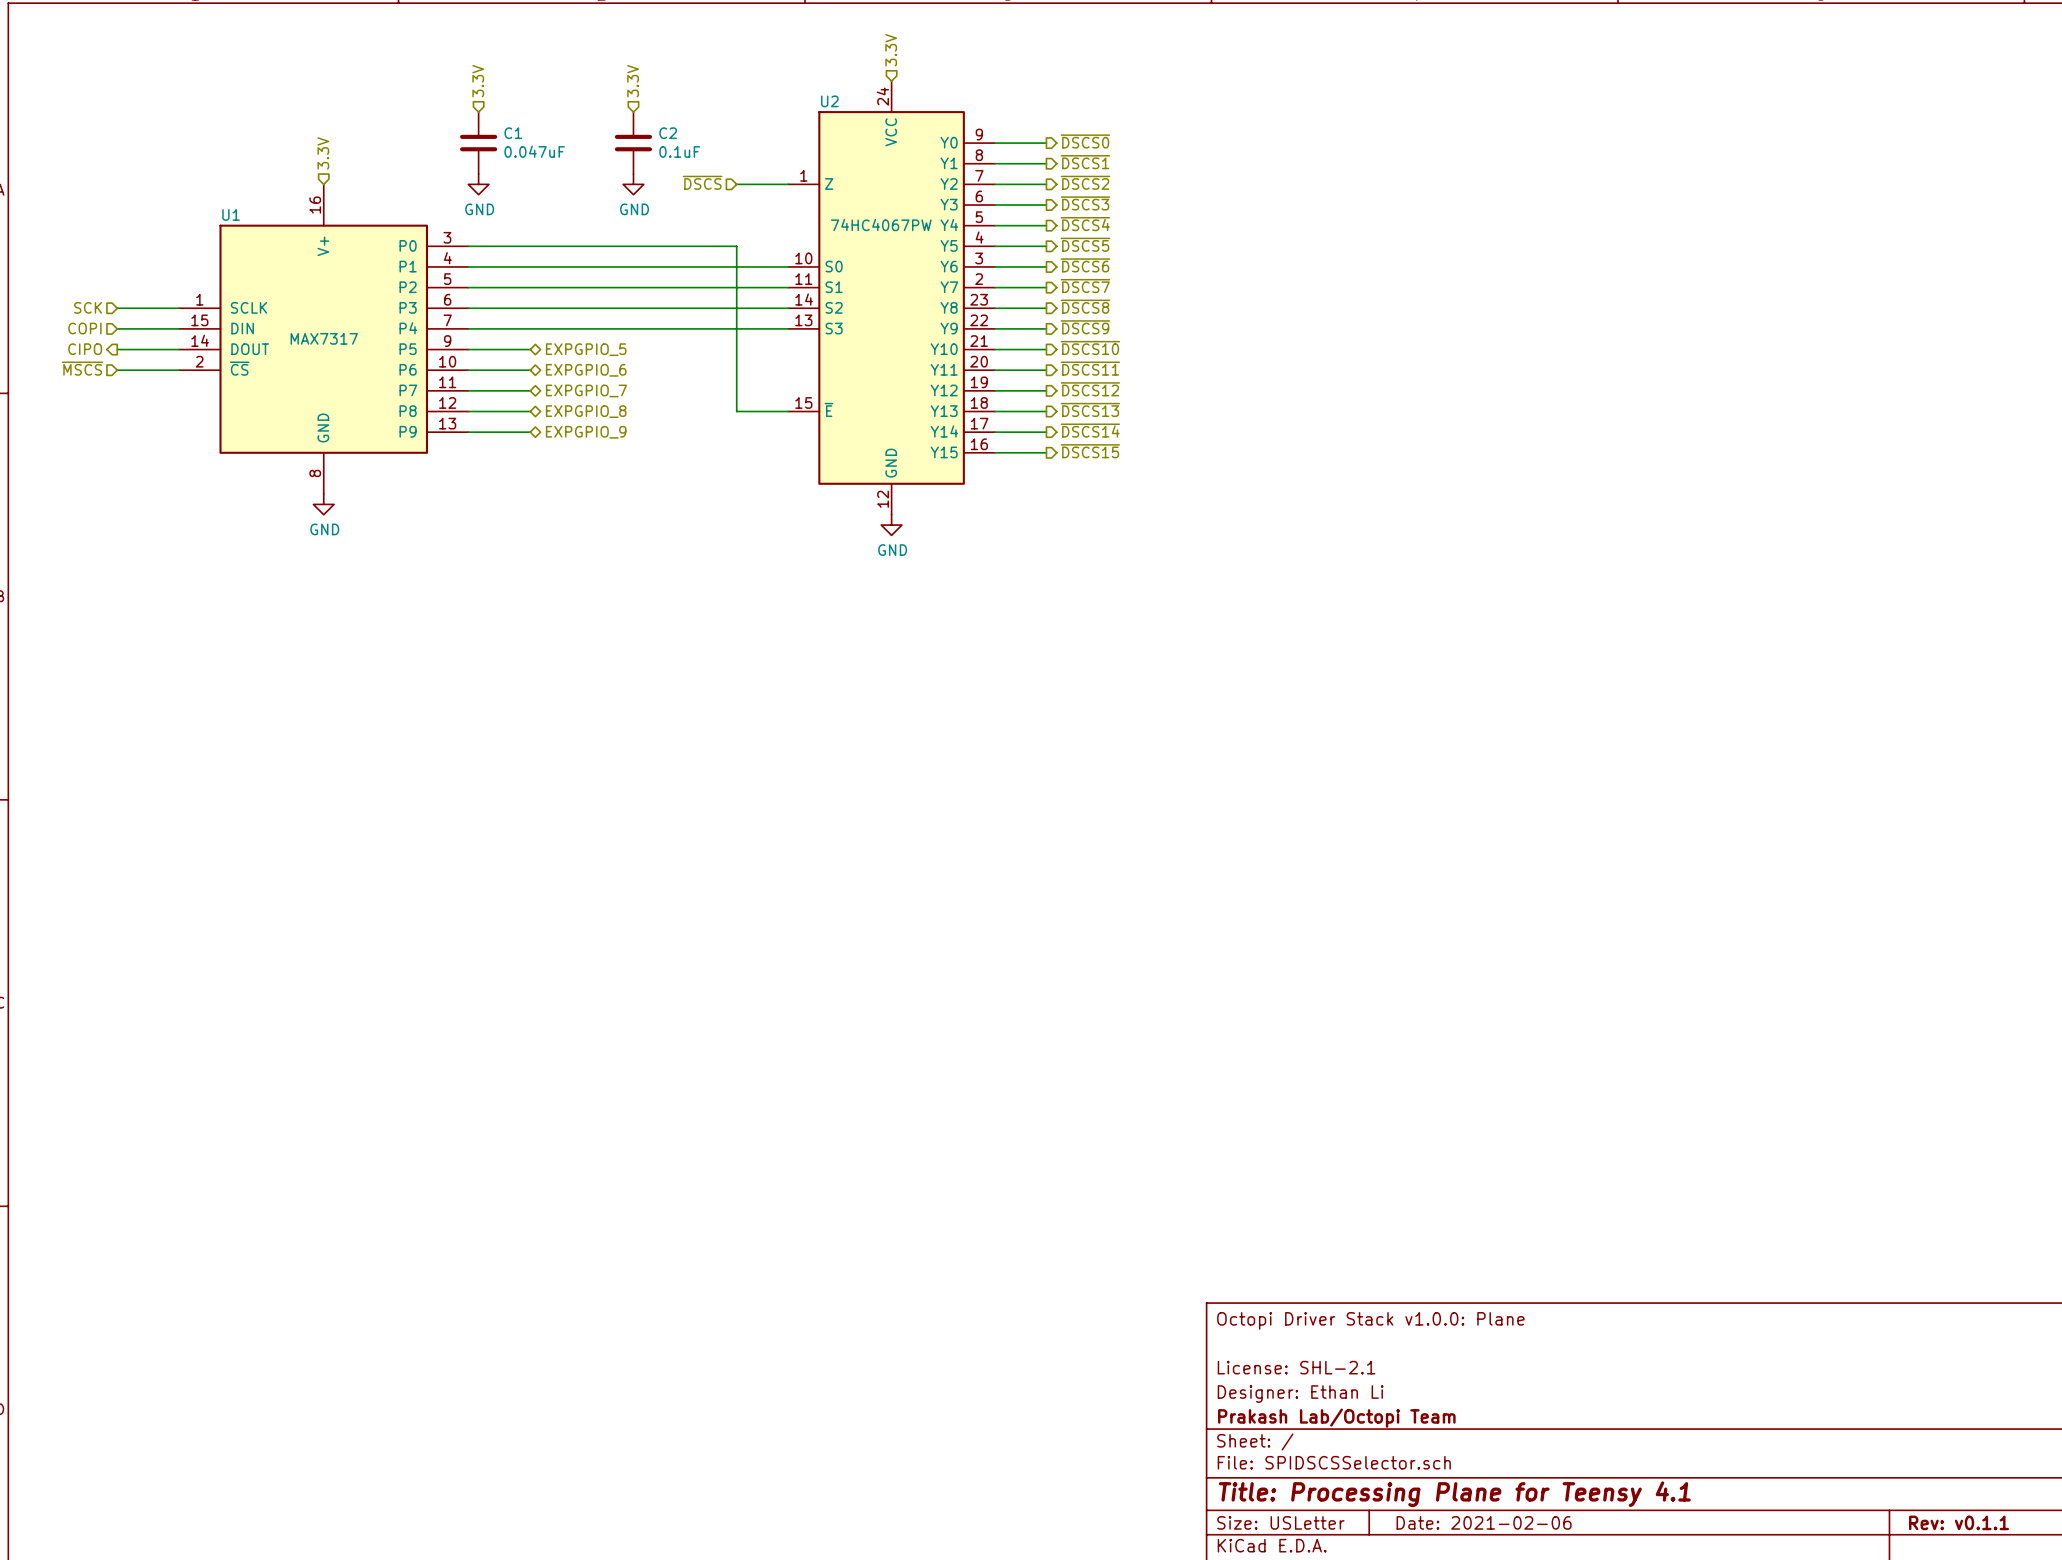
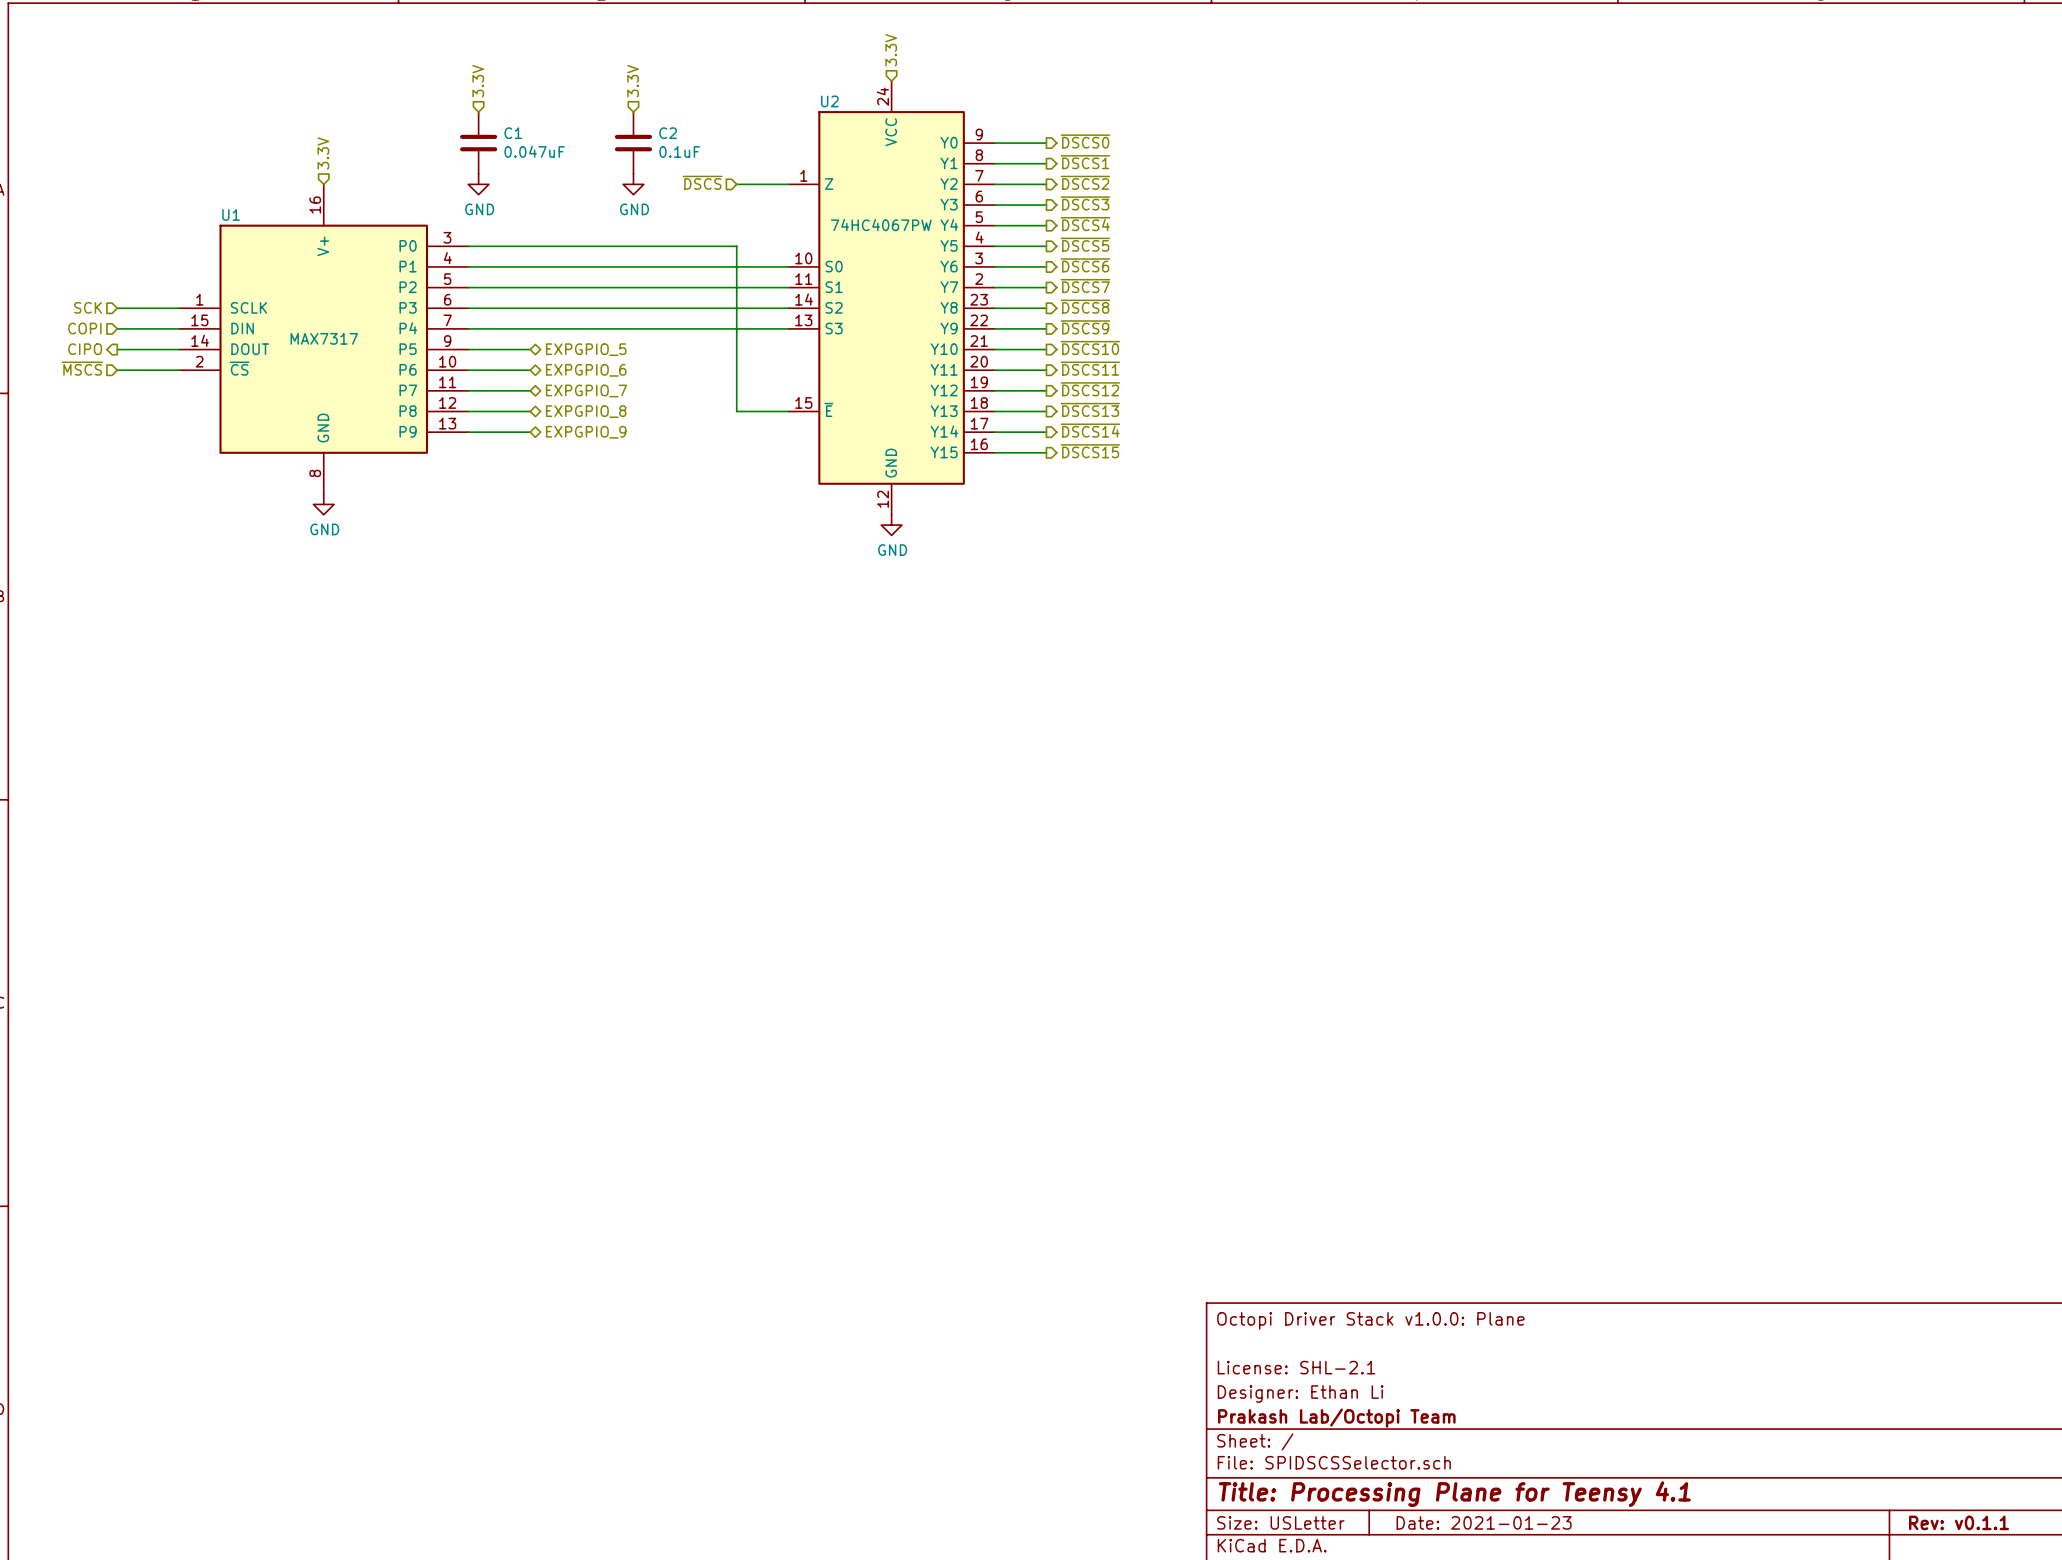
title block: Date: 2021-02-06 (1484, 1522) -> Date: 2021-01-23 (1484, 1522)

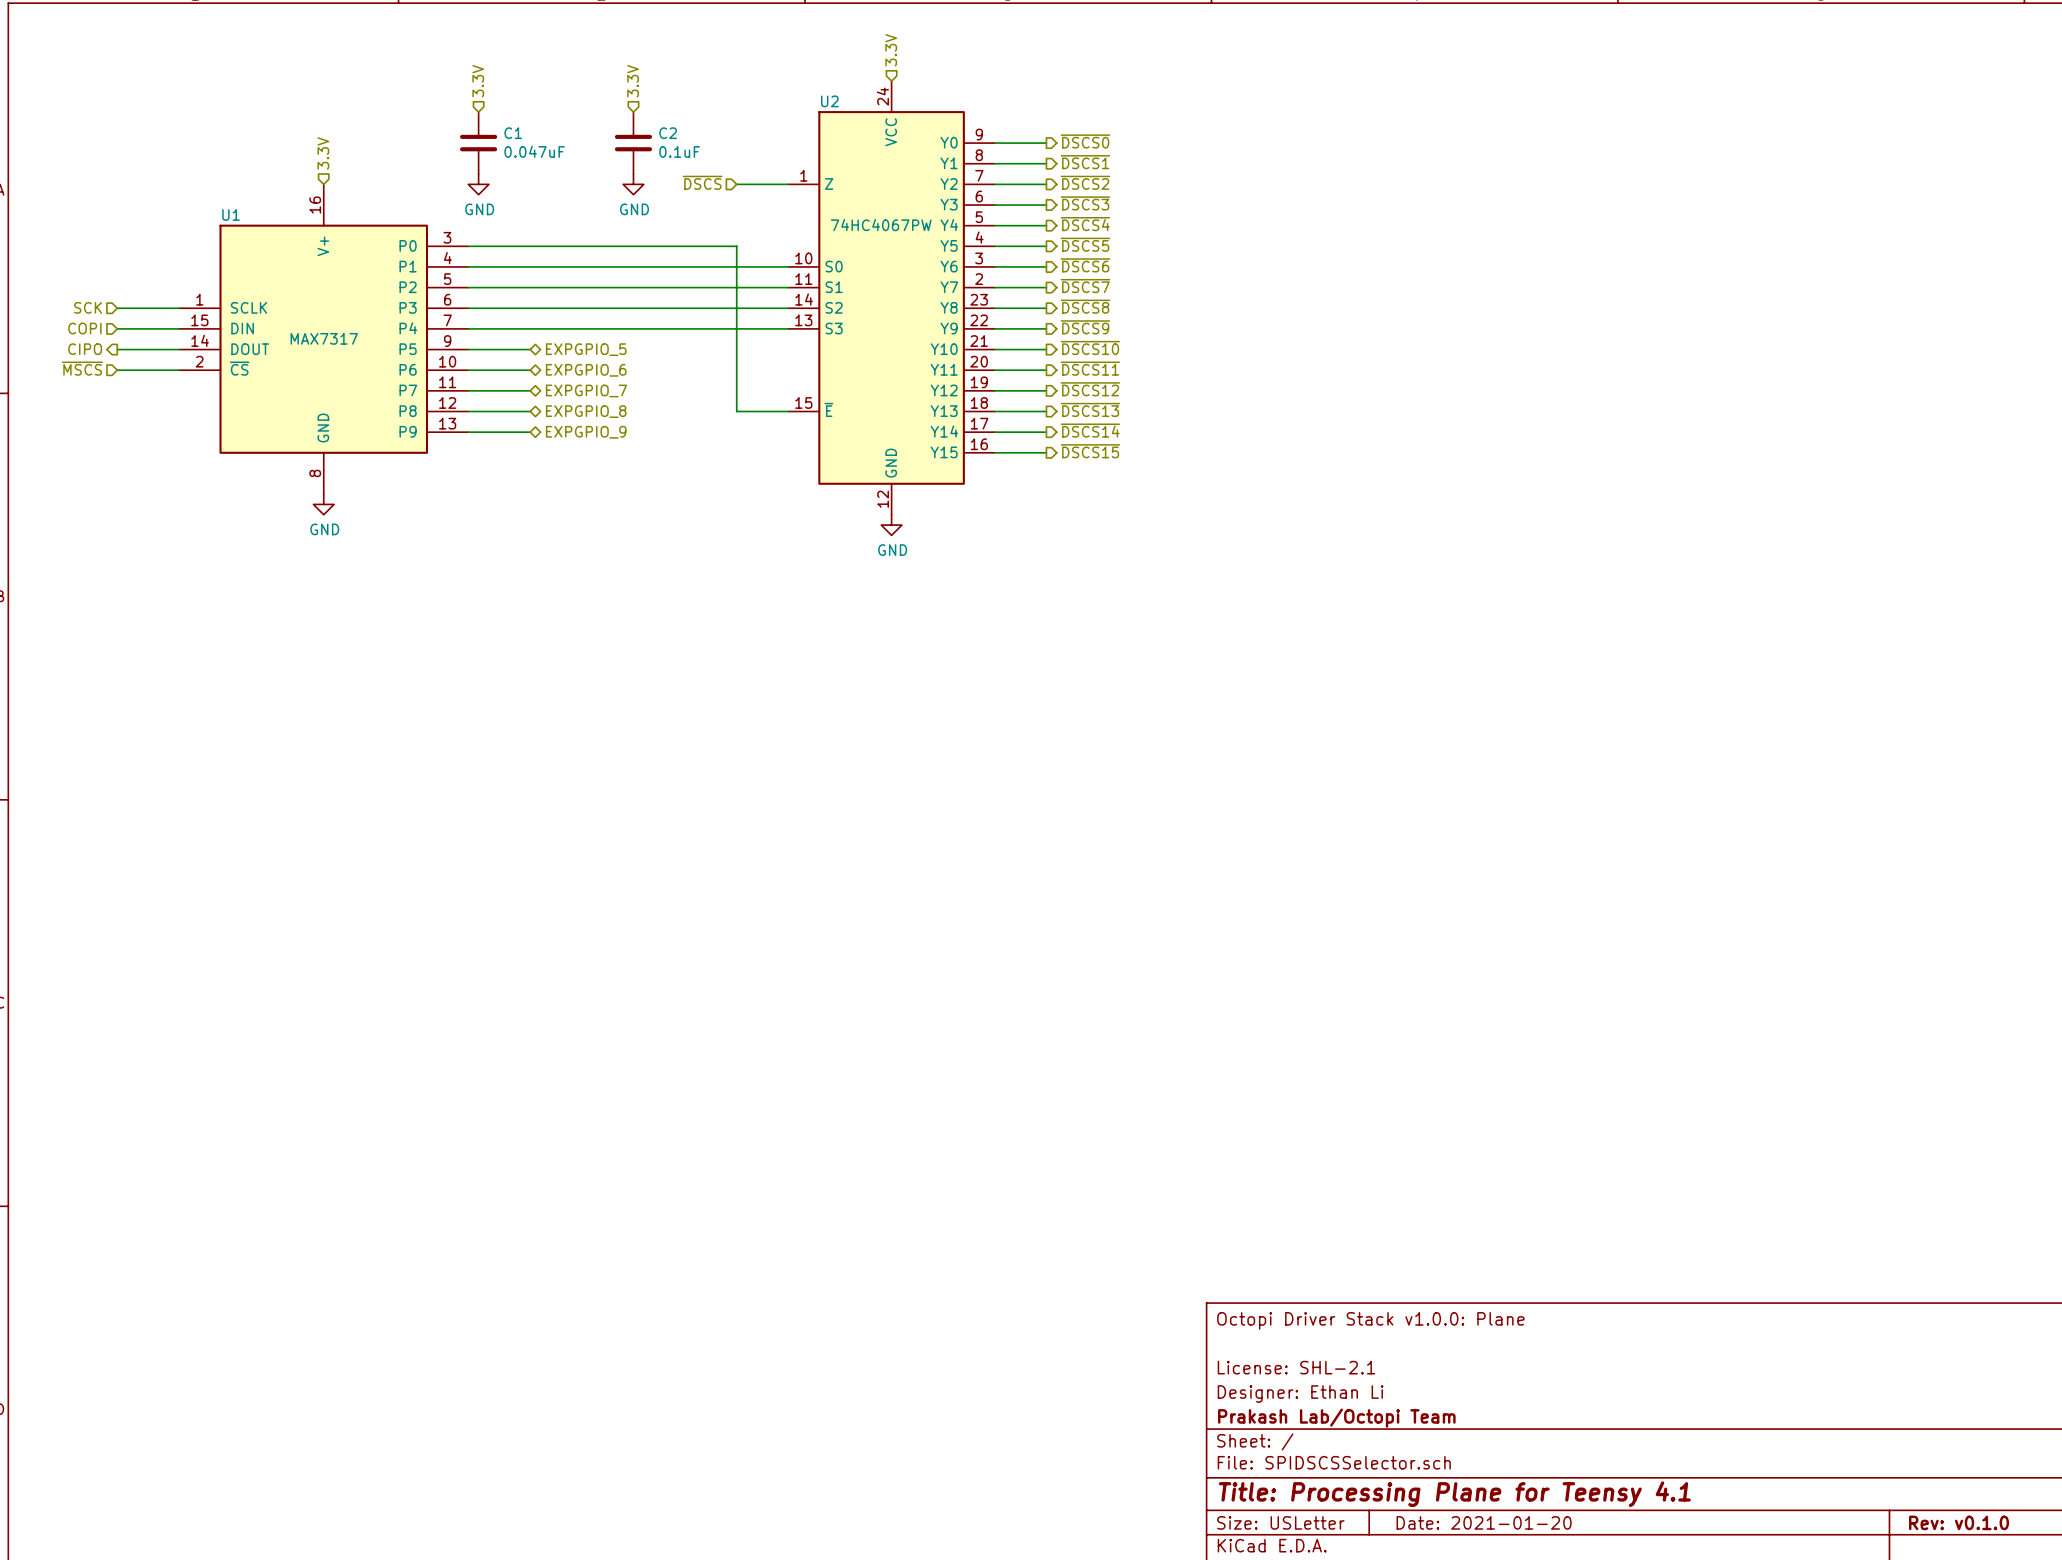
title block: Date: 2021-01-23 (1484, 1522) -> Date: 2021-01-20 (1484, 1522)
title block: Rev: v0.1.1 (1959, 1522) -> Rev: v0.1.0 (1959, 1522)

